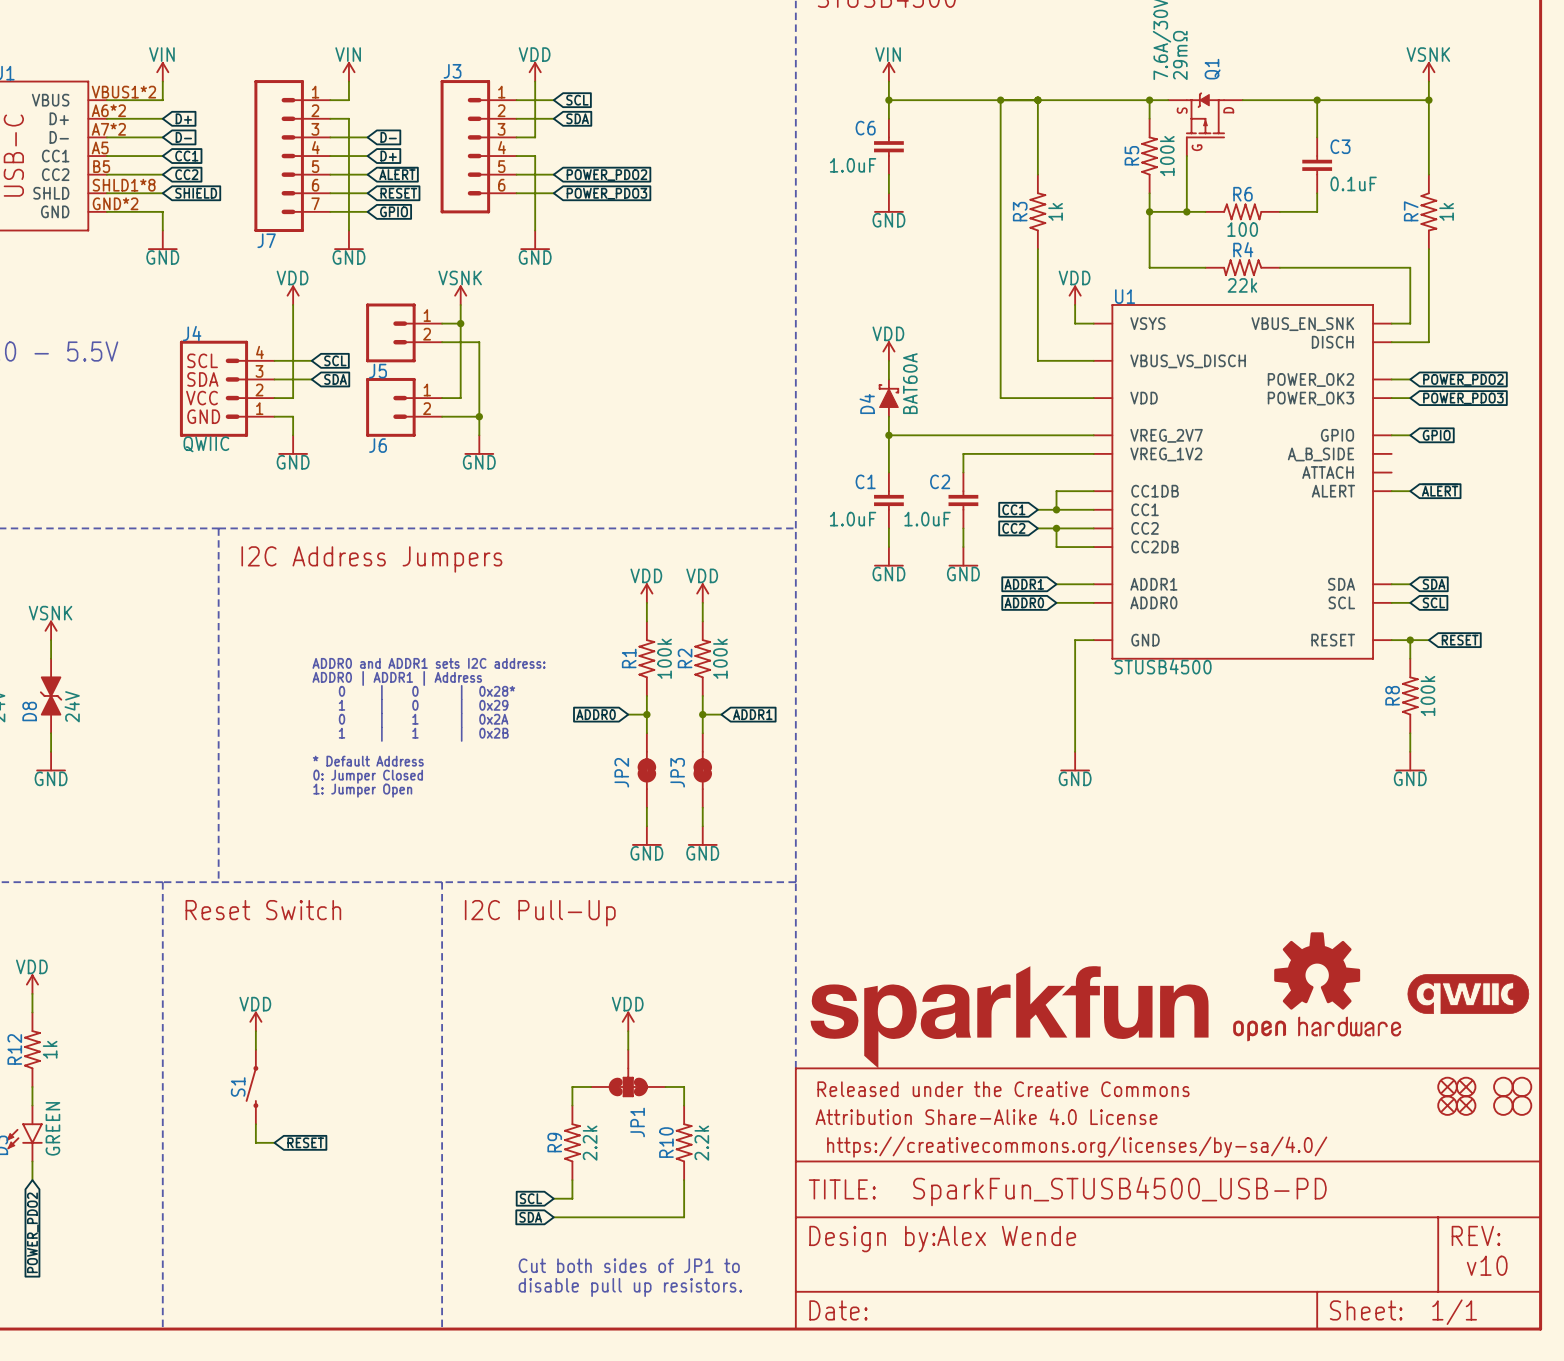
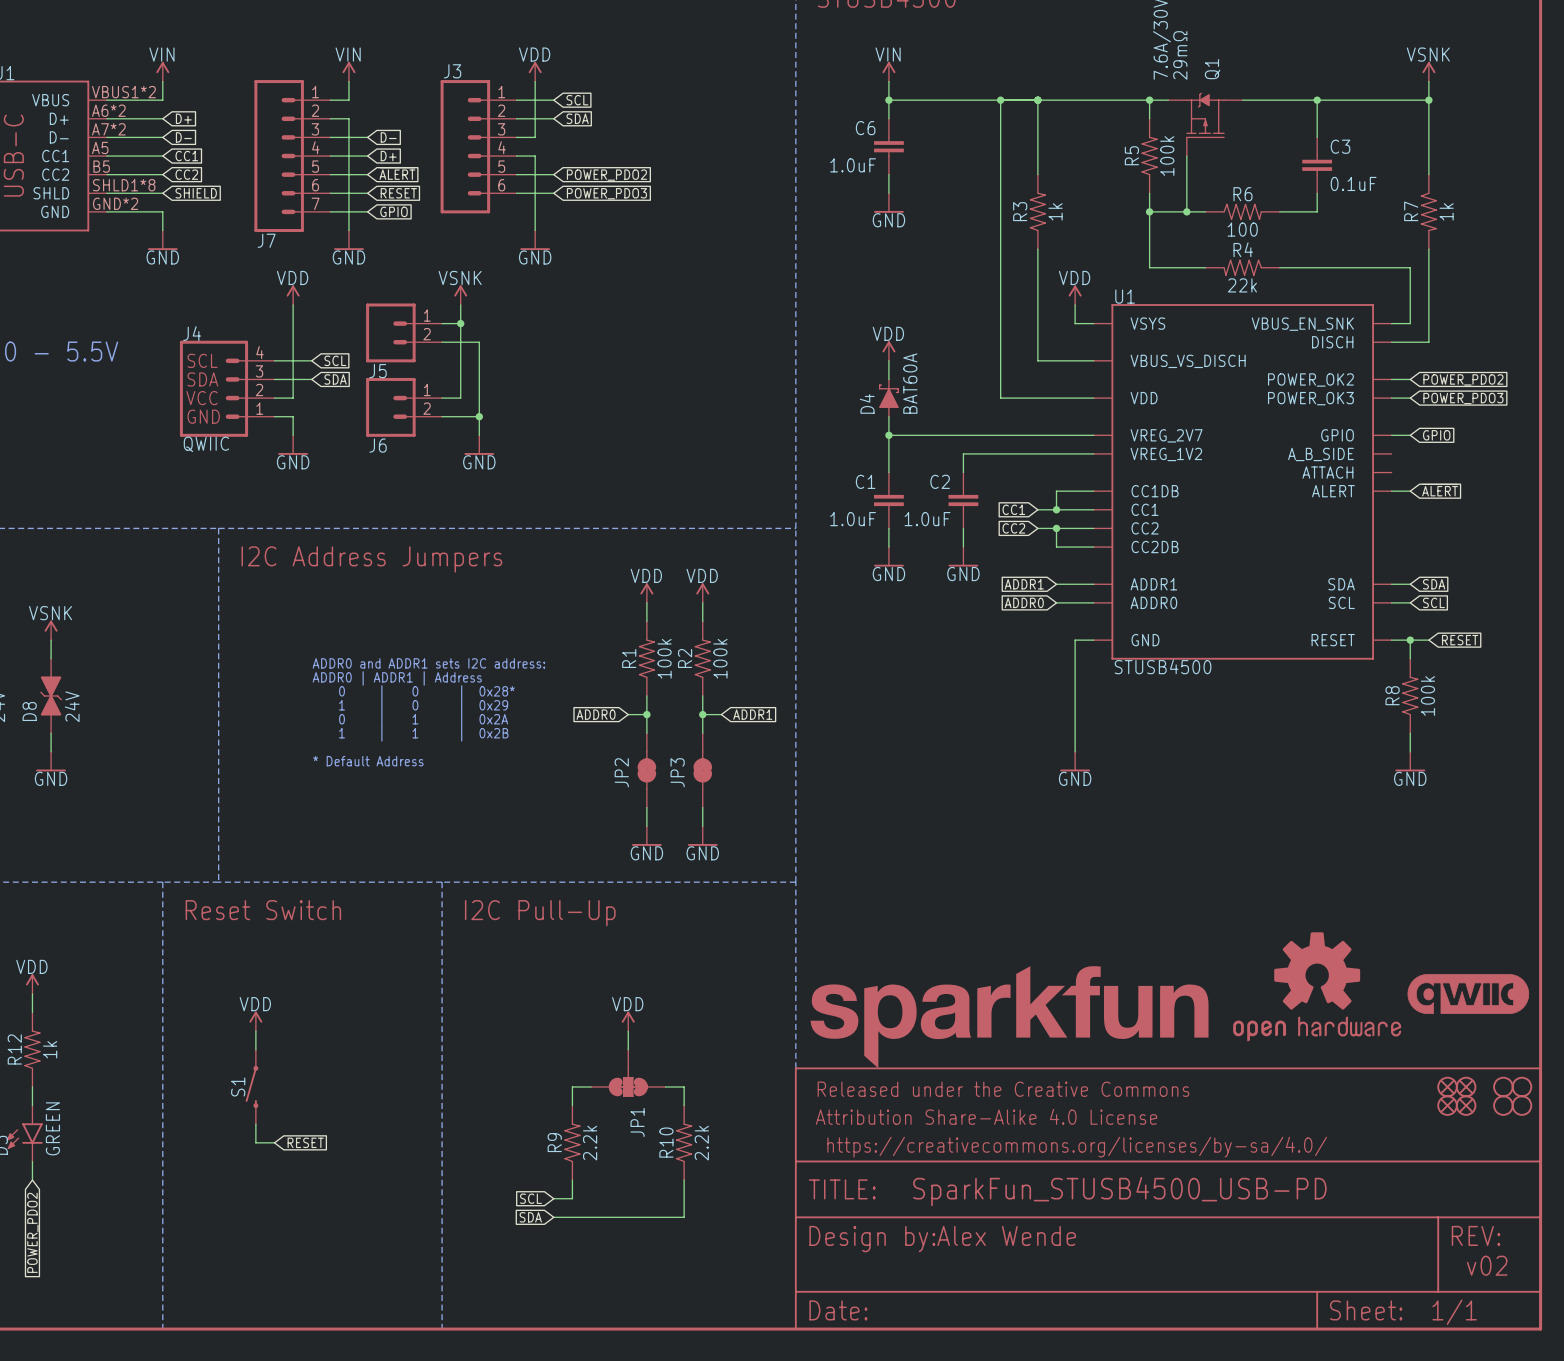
Q1 text: S (1182, 110) -> none
Q1 text: D (1228, 110) -> none
Q1 text: G (1197, 147) -> none
text: 0: Jumper Closed (368, 776) -> none
text: 1: Jumper Open (362, 790) -> none
text: Cut both sides of JP1 to (629, 1265) -> none
text: v10 (1487, 1265) -> v02 (1487, 1265)
text: disable pull up resistors. (630, 1287) -> none

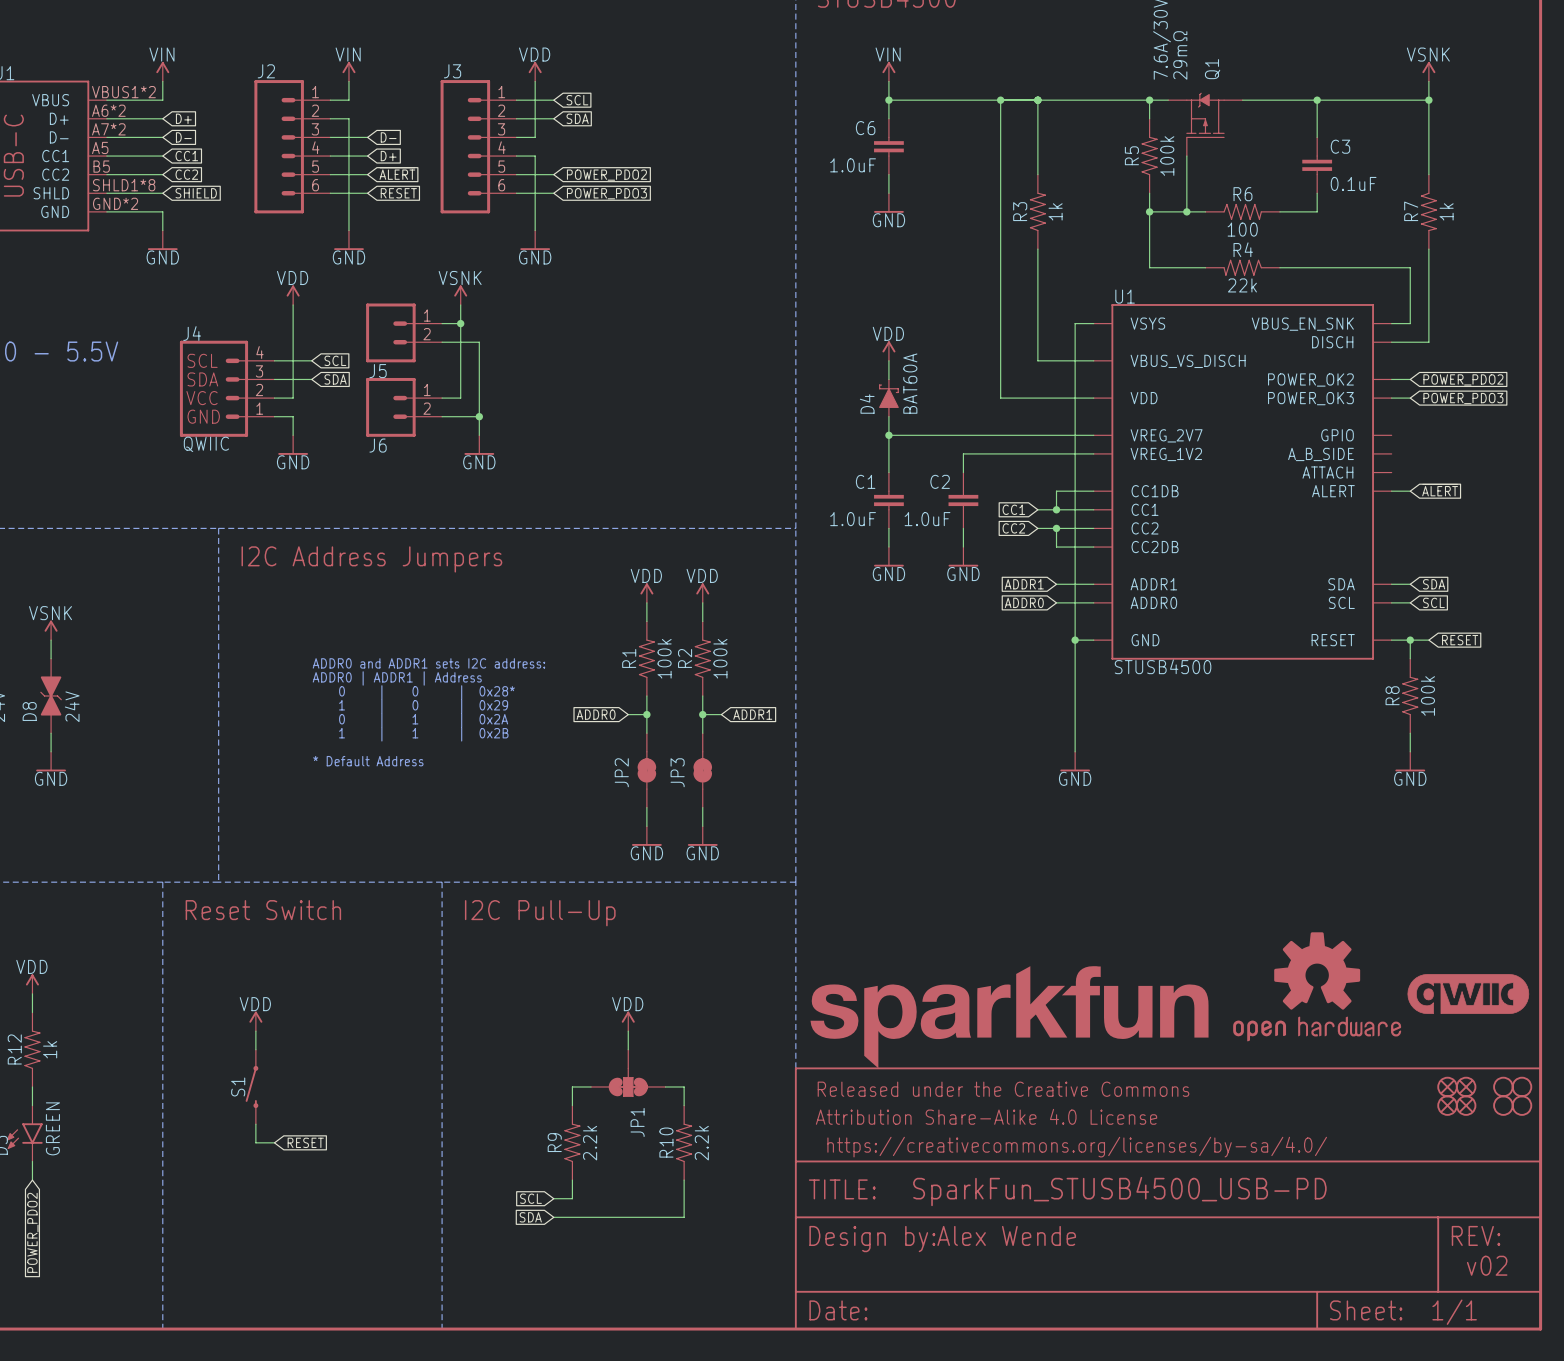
J2: none -> (292, 146)
J7: (292, 156) -> none
wire: (330, 211) (367, 211) -> none
global label: GPIO (394, 211) -> none
power symbol: VDD (1075, 295) -> none
wire: (1075, 304) (1075, 323) -> (1075, 640) (1075, 323)
wire: (1391, 435) (1410, 435) -> none
global label: GPIO (1436, 435) -> none
junction: none -> (1075, 640)

